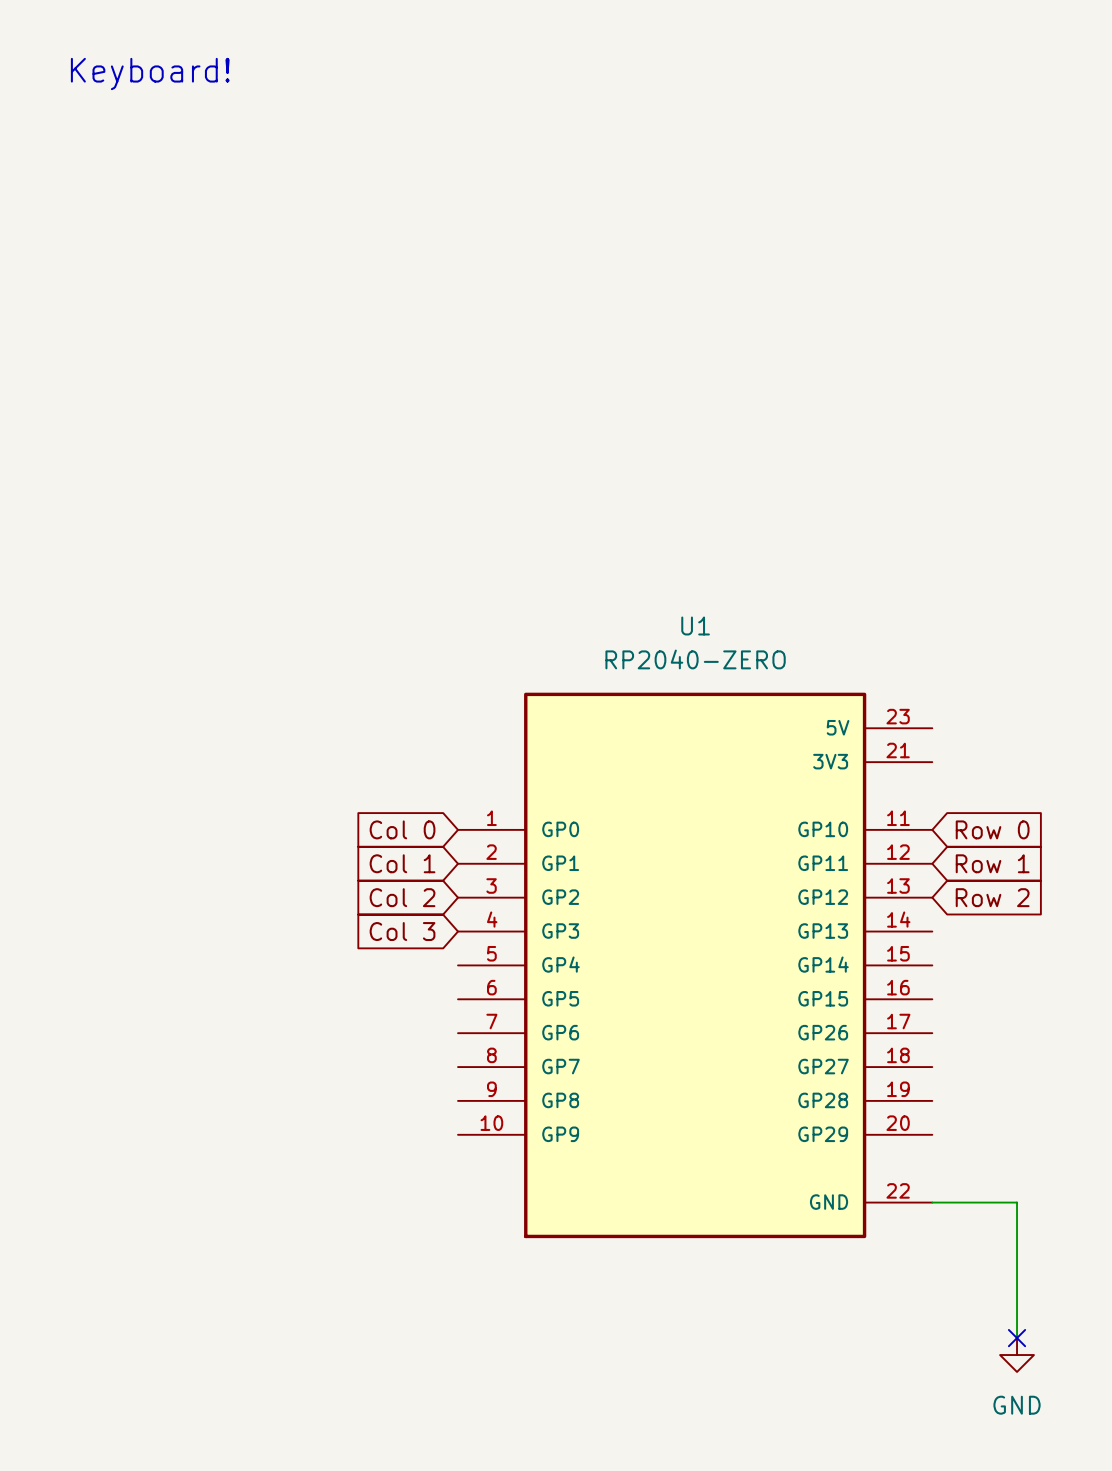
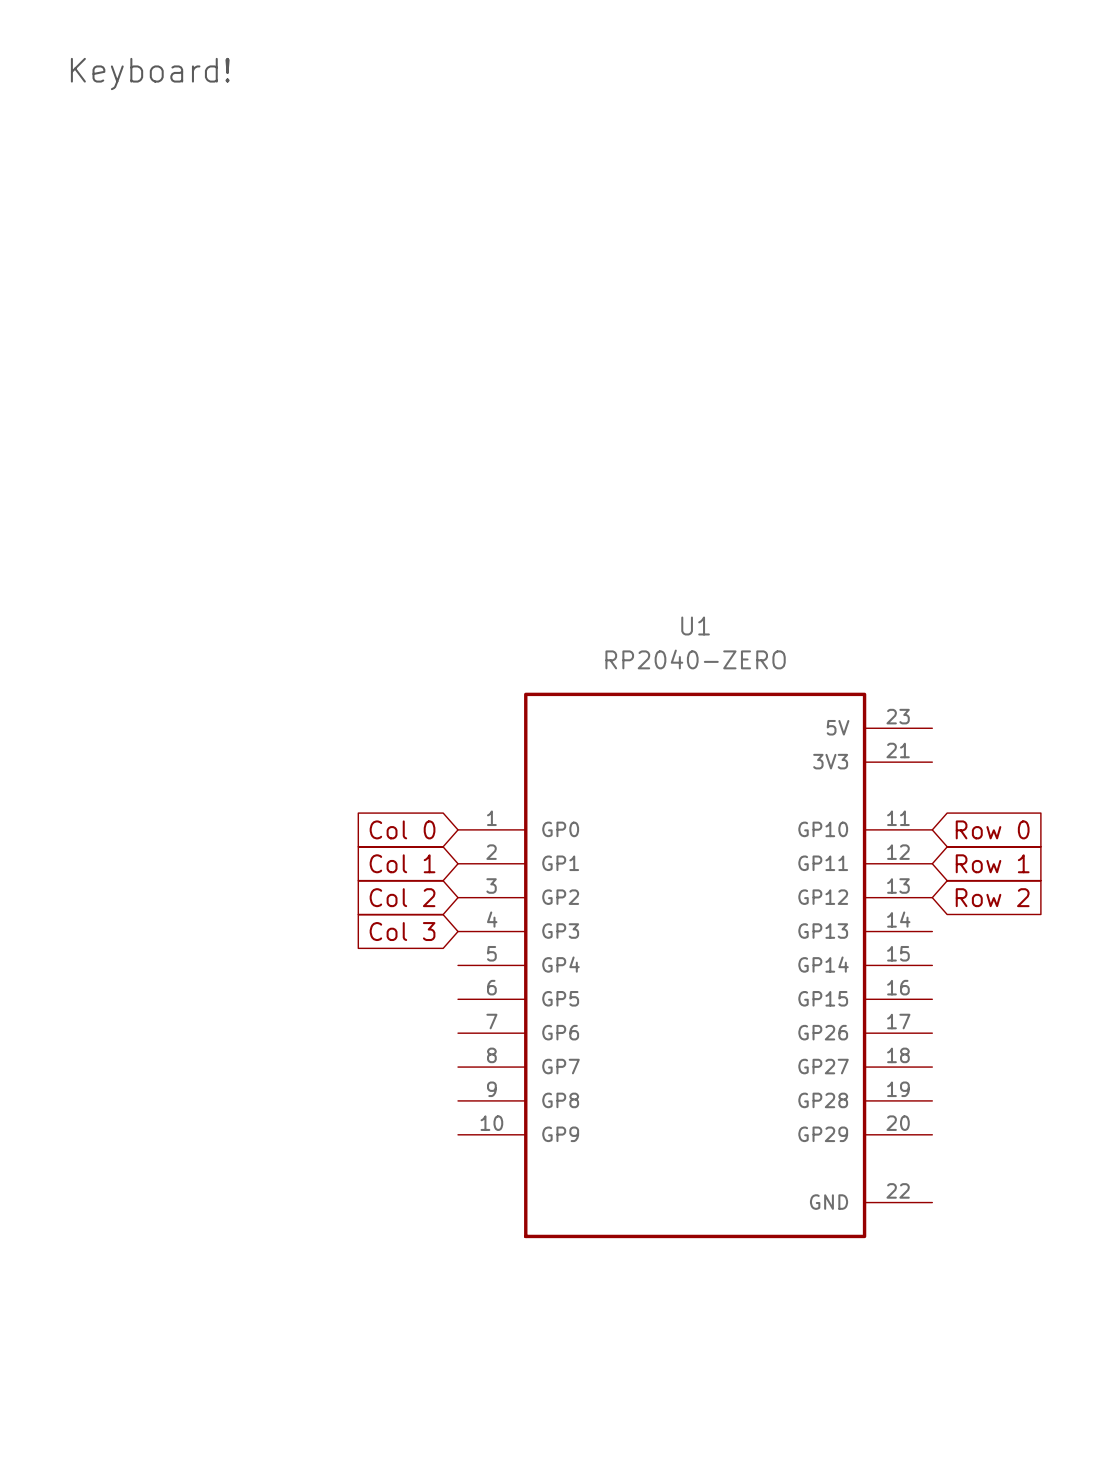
wire: (932, 1202) (1017, 1202) (1017, 1338) -> none
no-connect mark: (1017, 1338) -> none
power symbol: GND (1017, 1355) -> none

